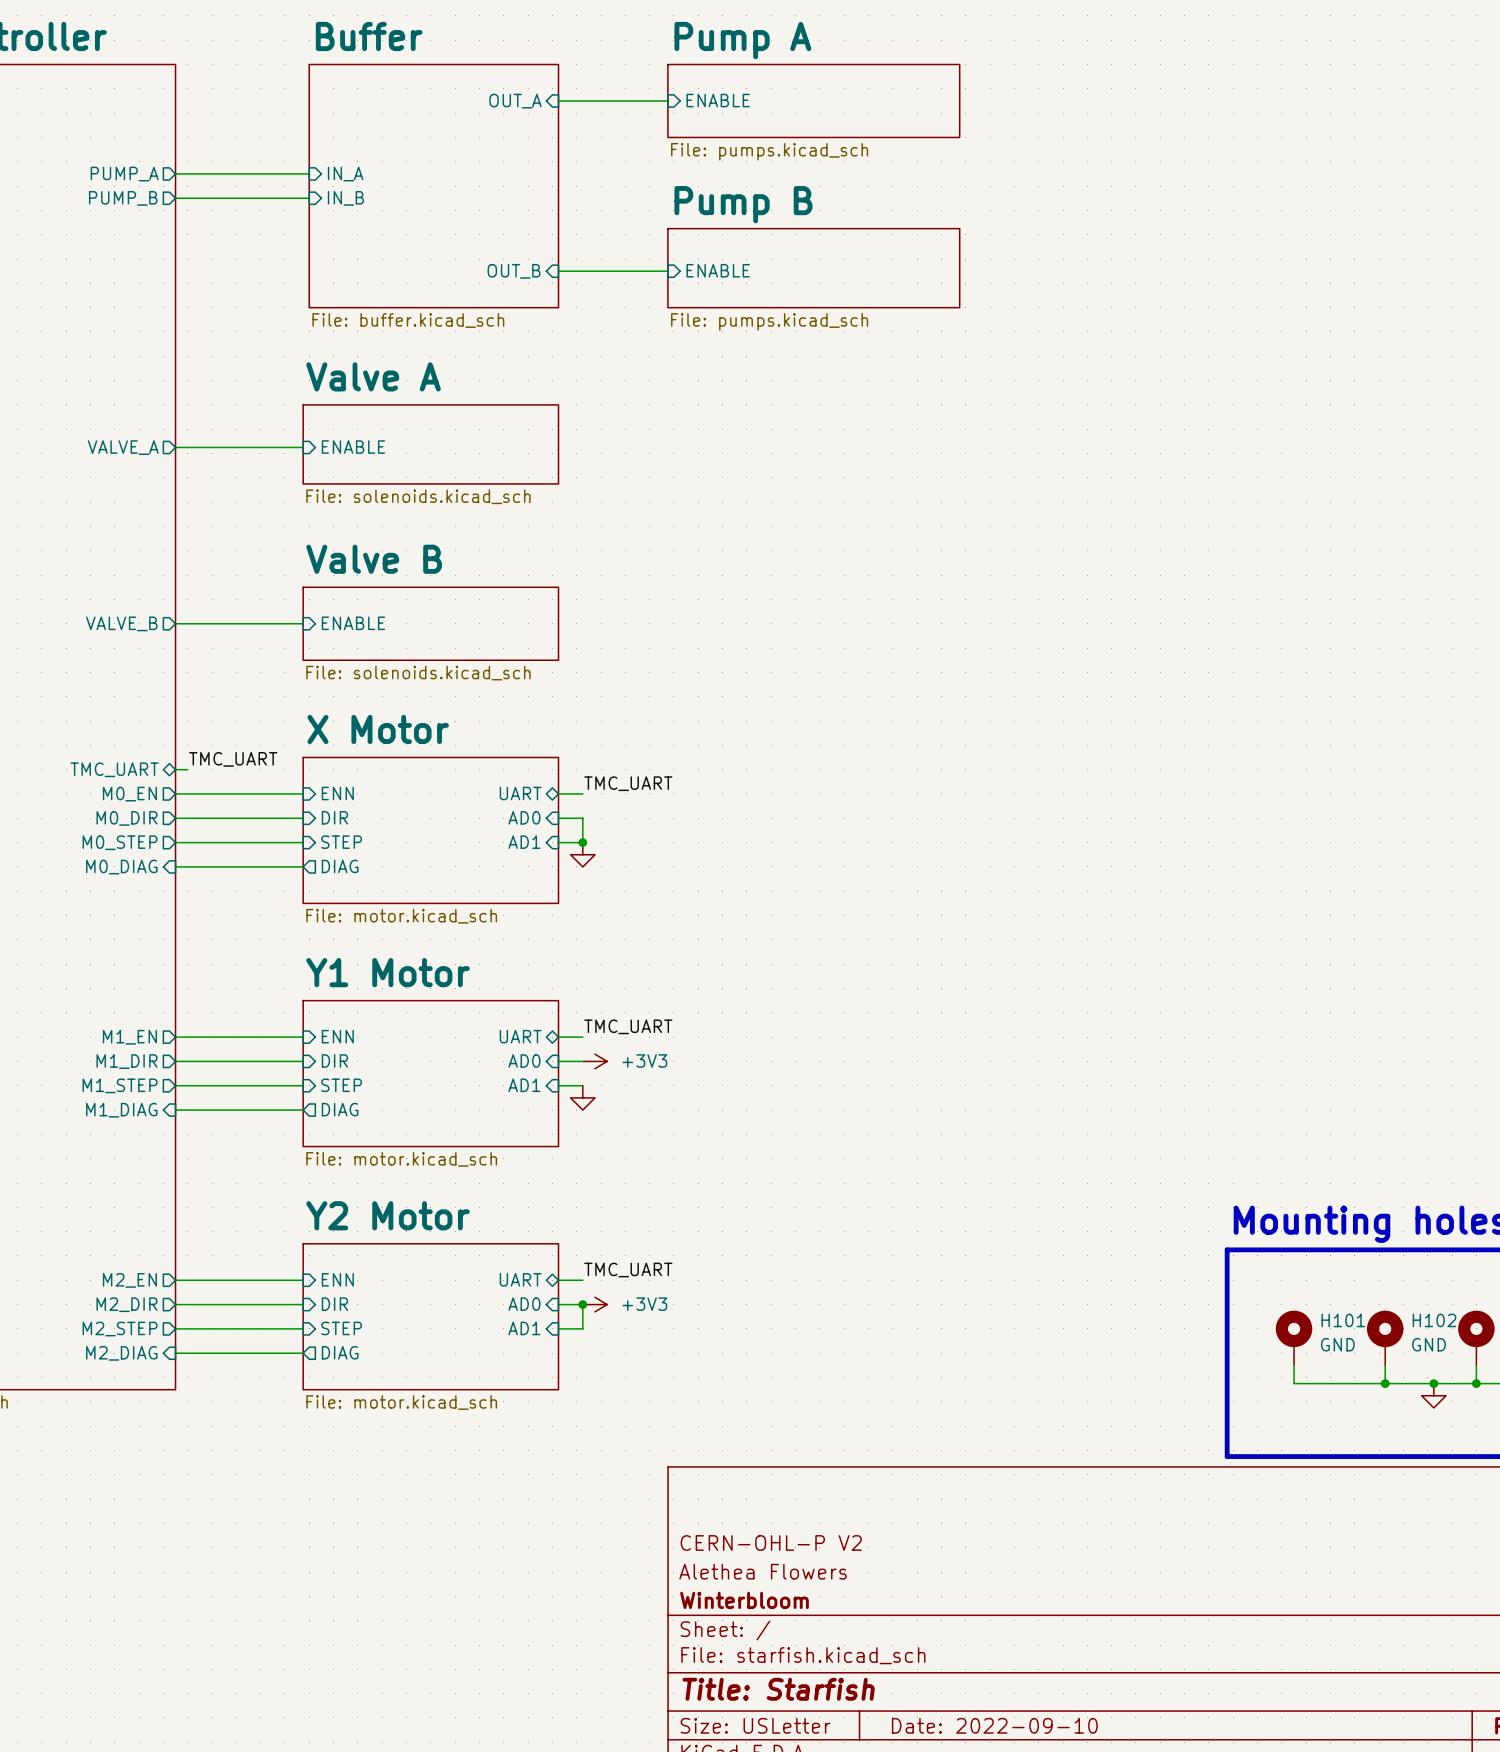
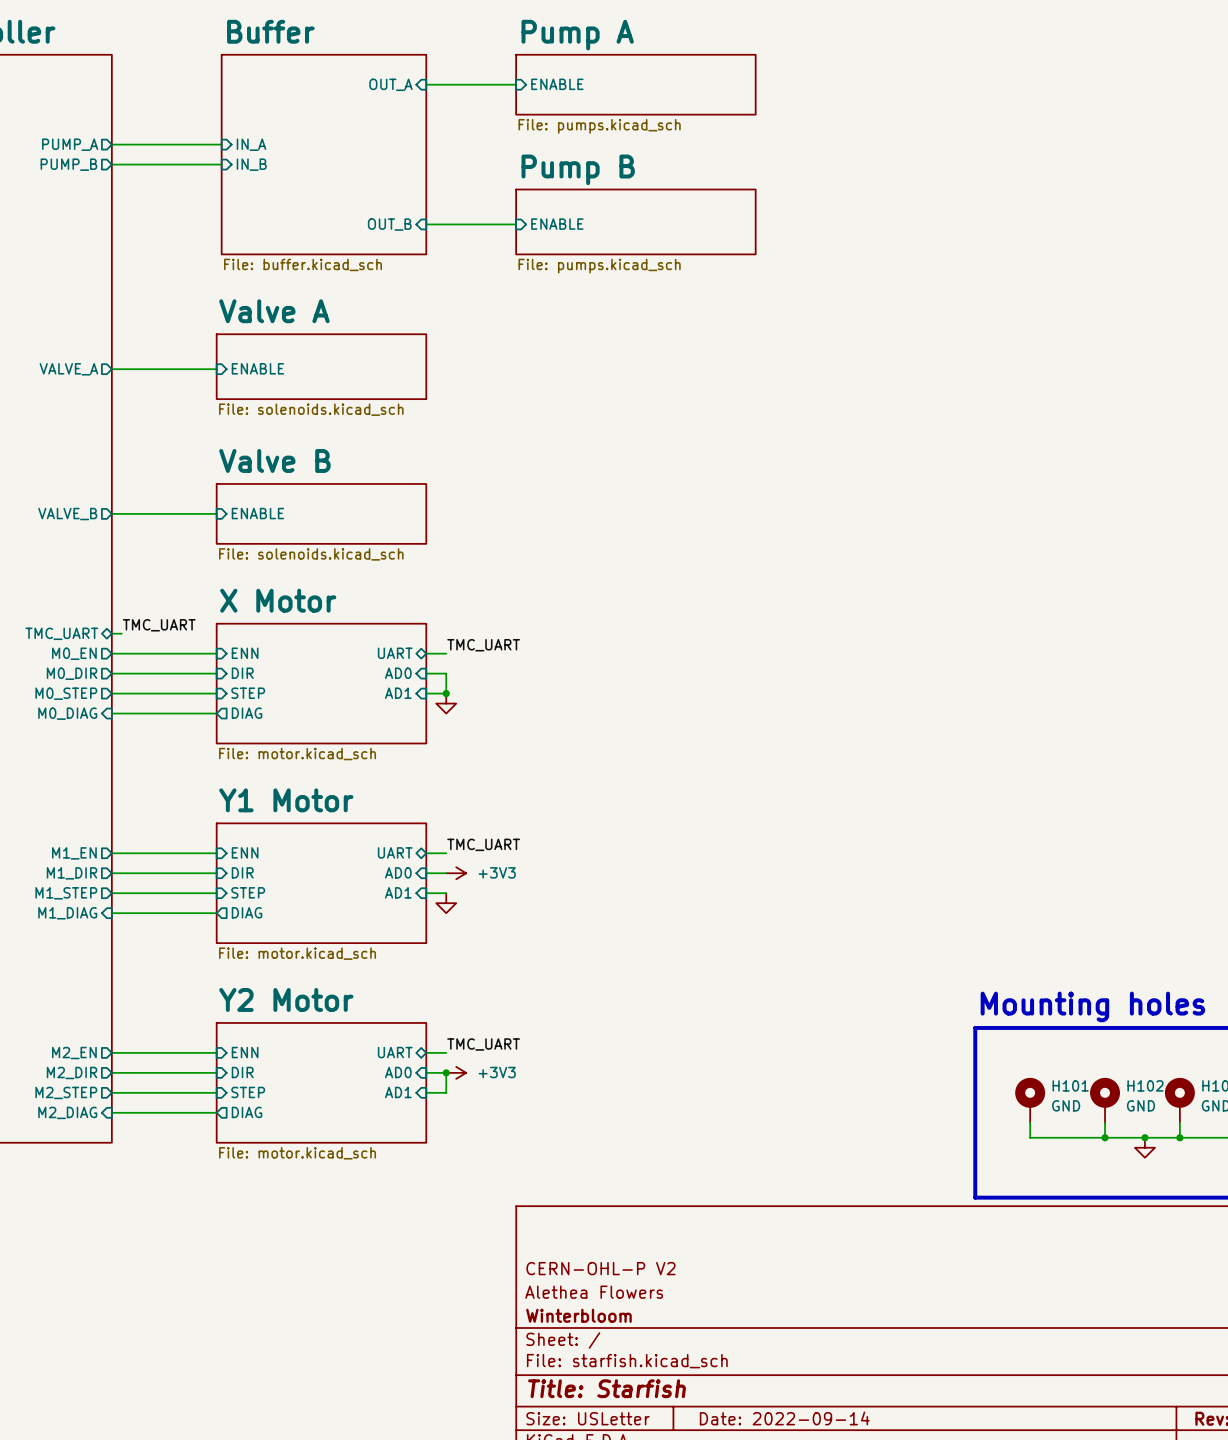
title block: Date: 2022-09-10 (994, 1725) -> Date: 2022-09-14 (784, 1418)

